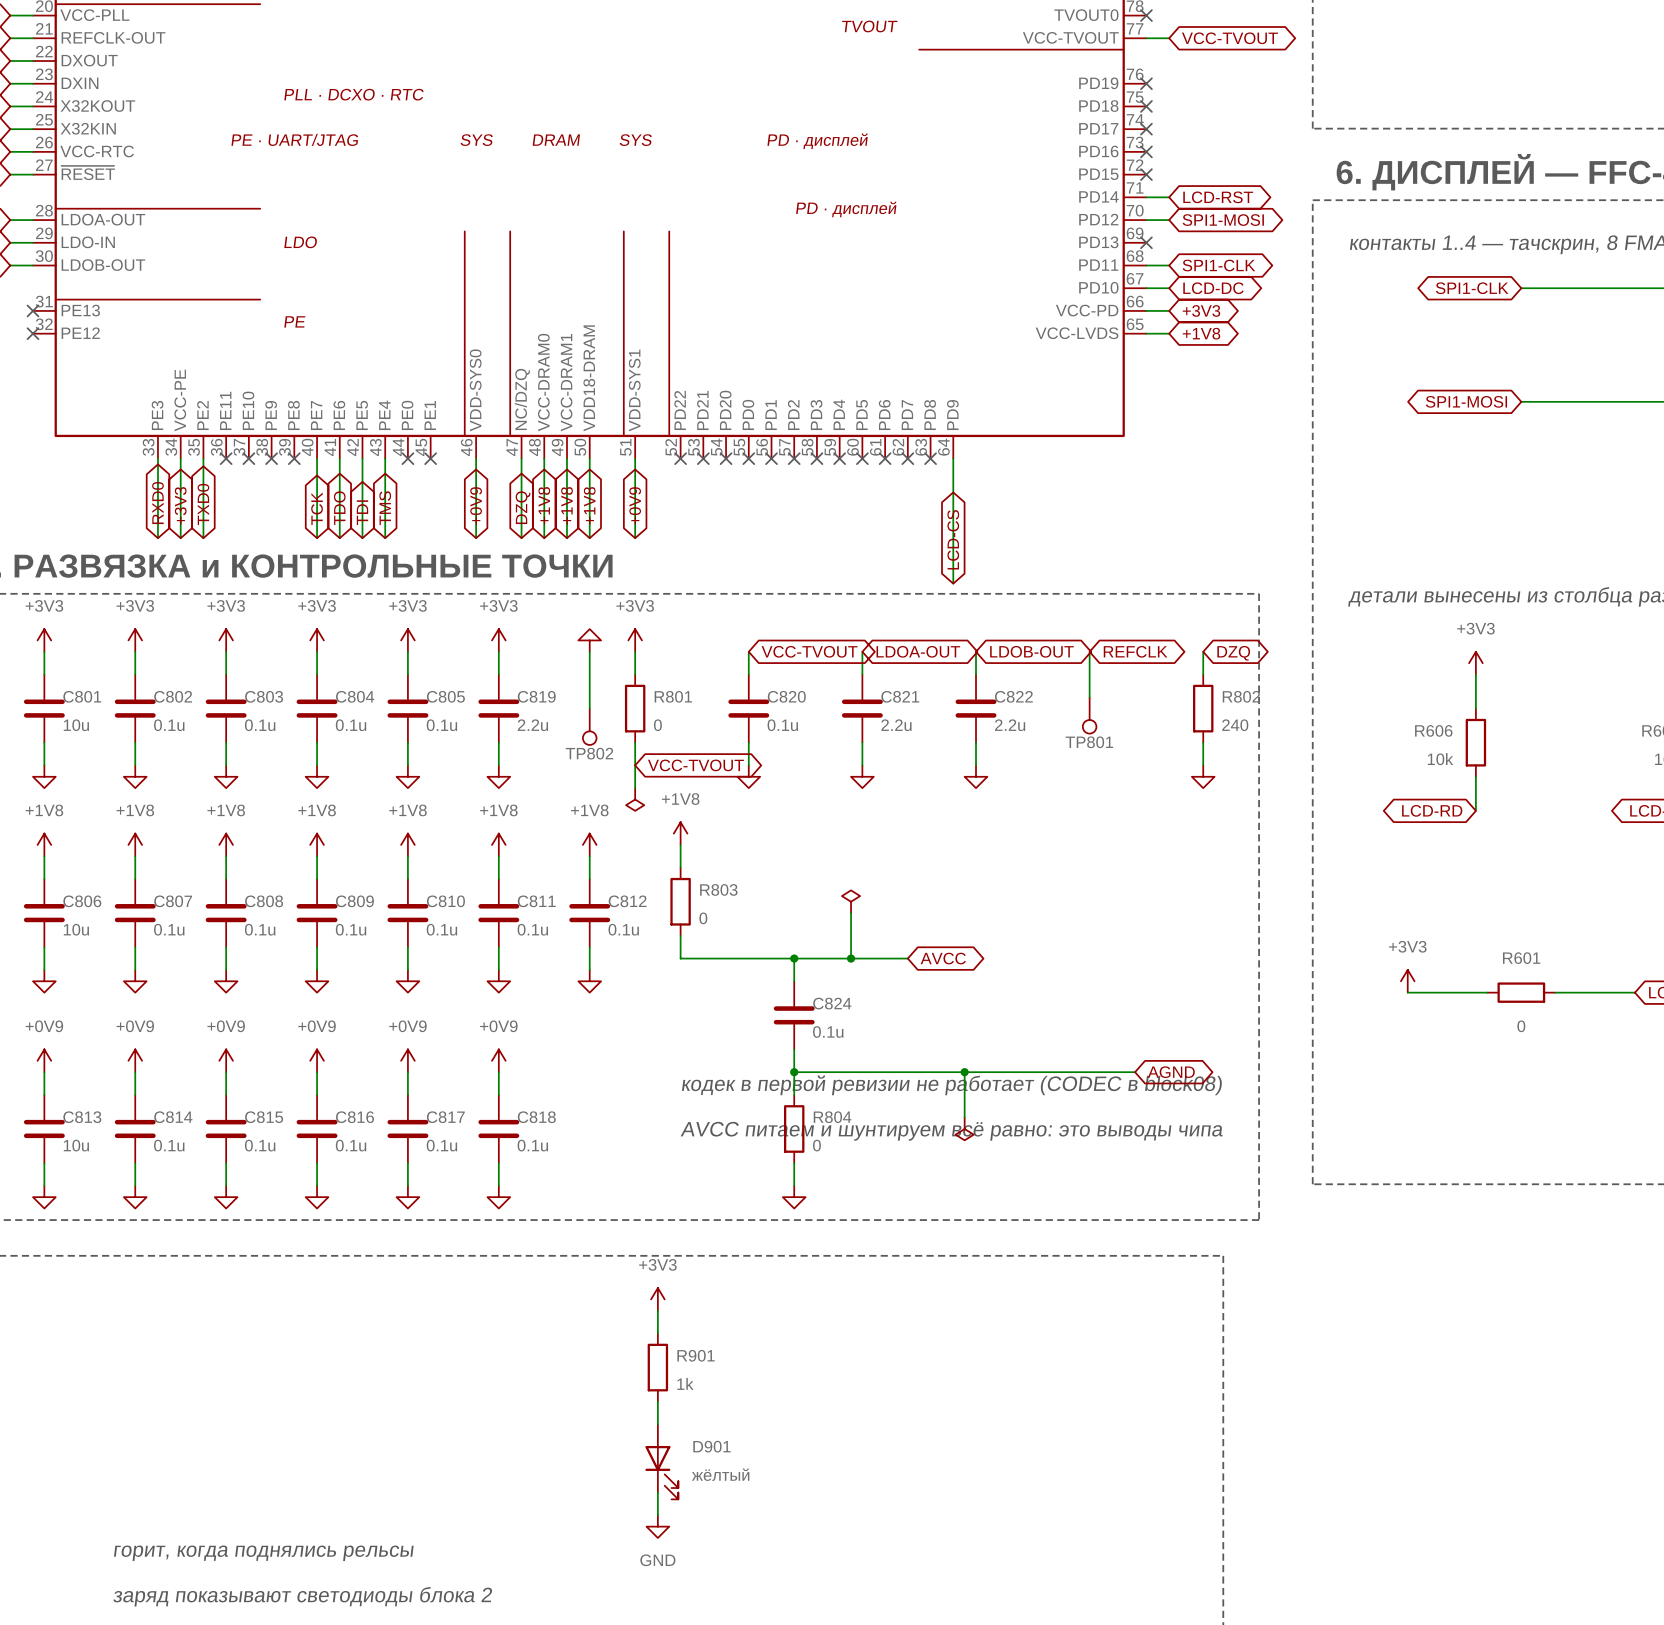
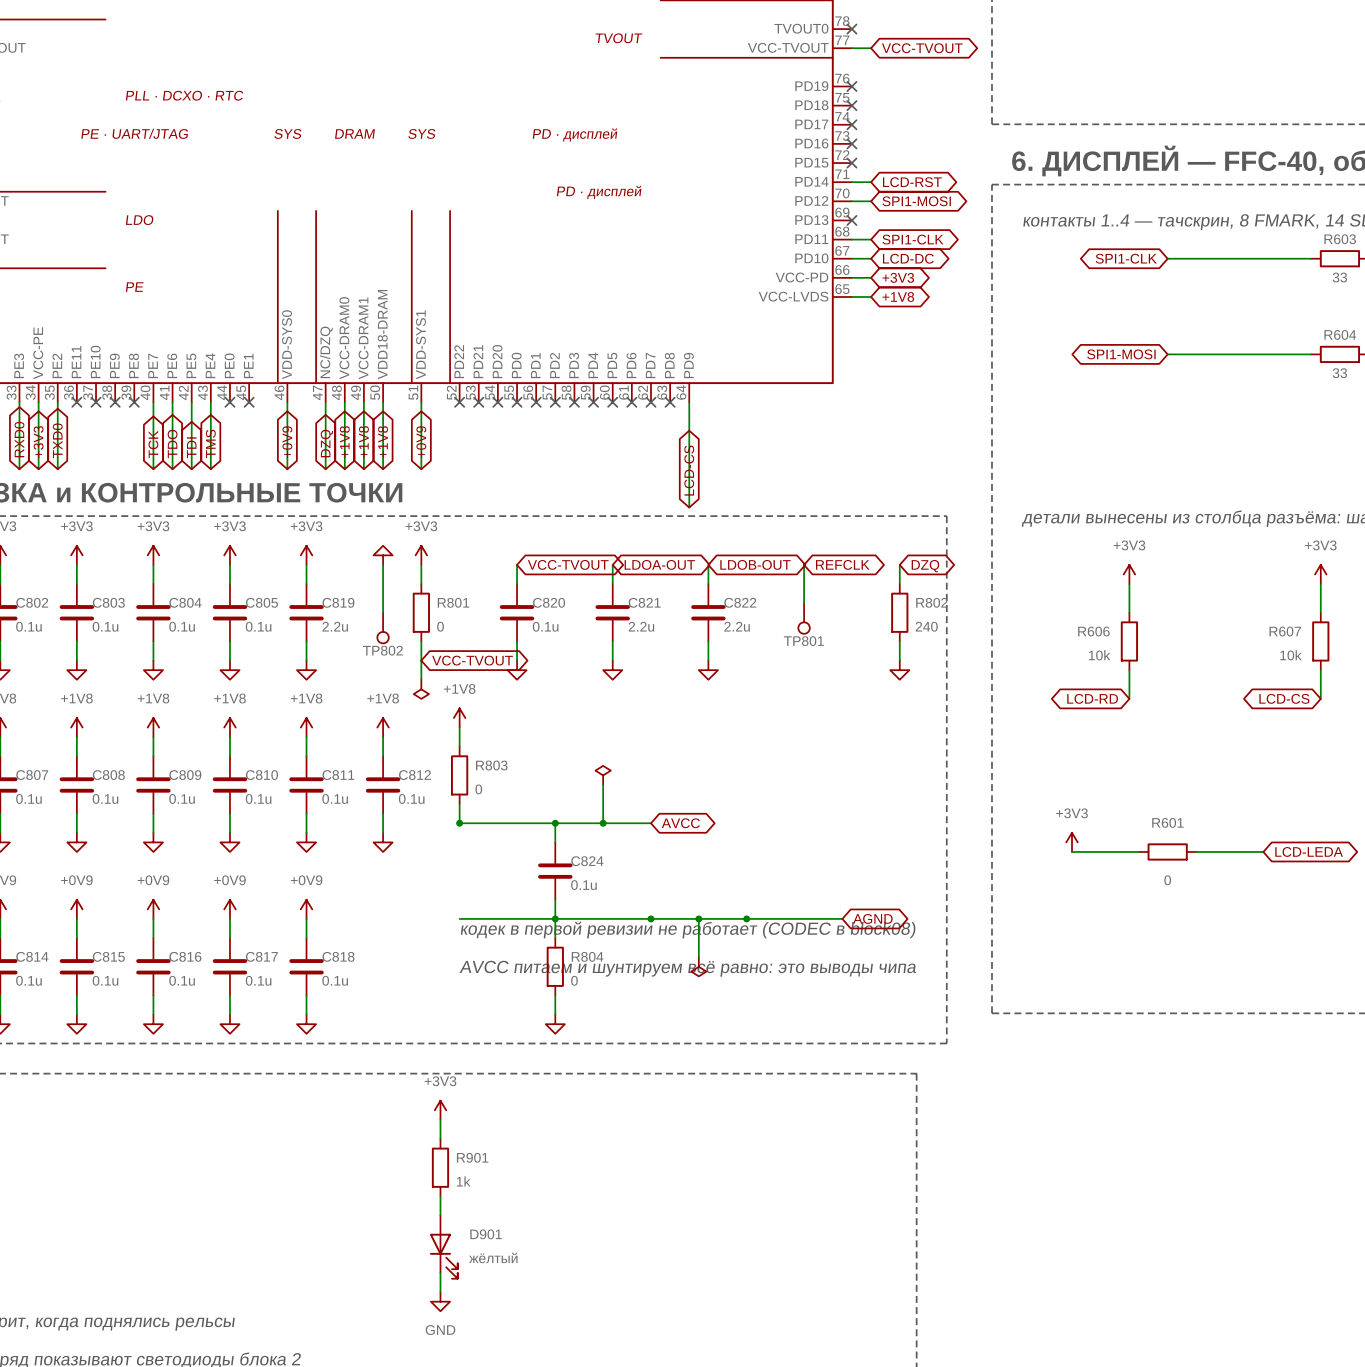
junction: none -> (459, 823)
wire: none -> (459, 918) (555, 918)
junction: none -> (650, 918)
junction: none -> (746, 918)

